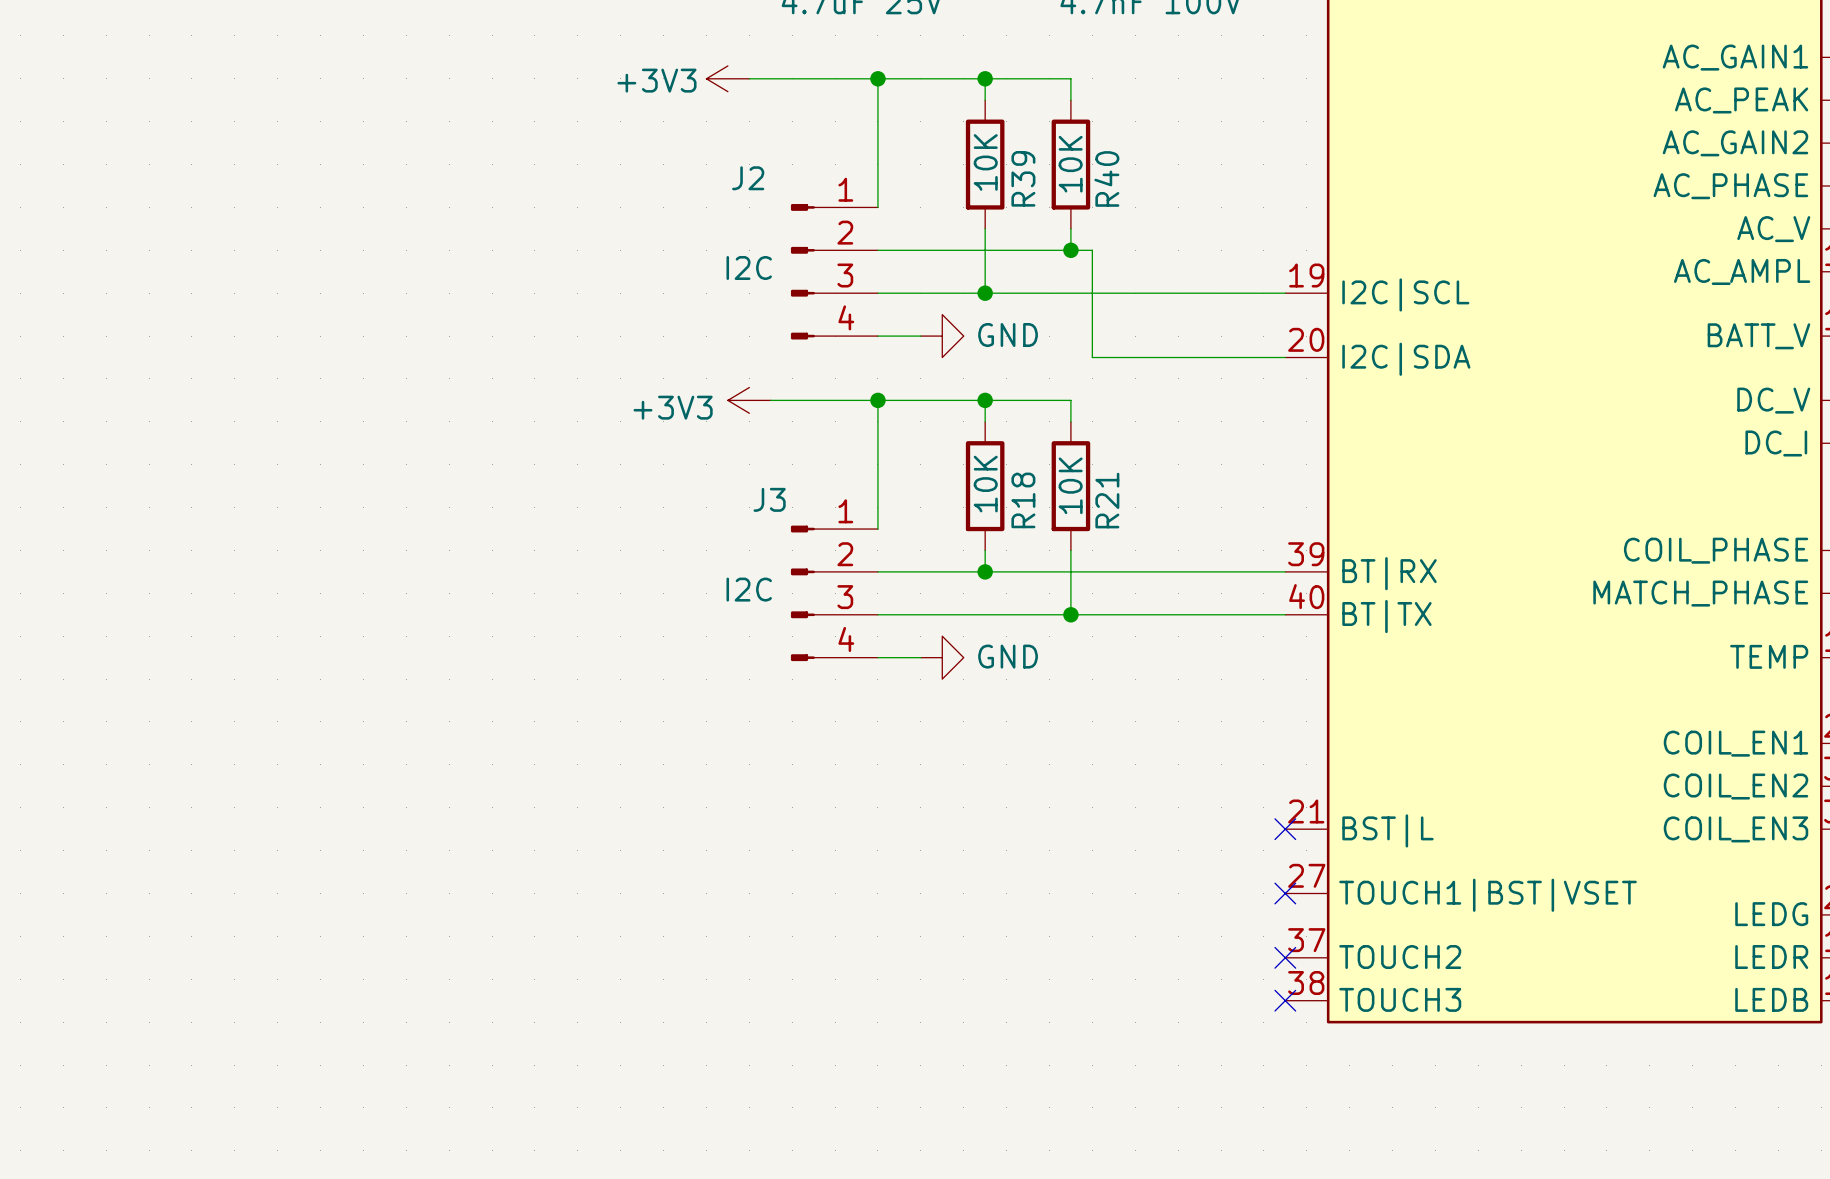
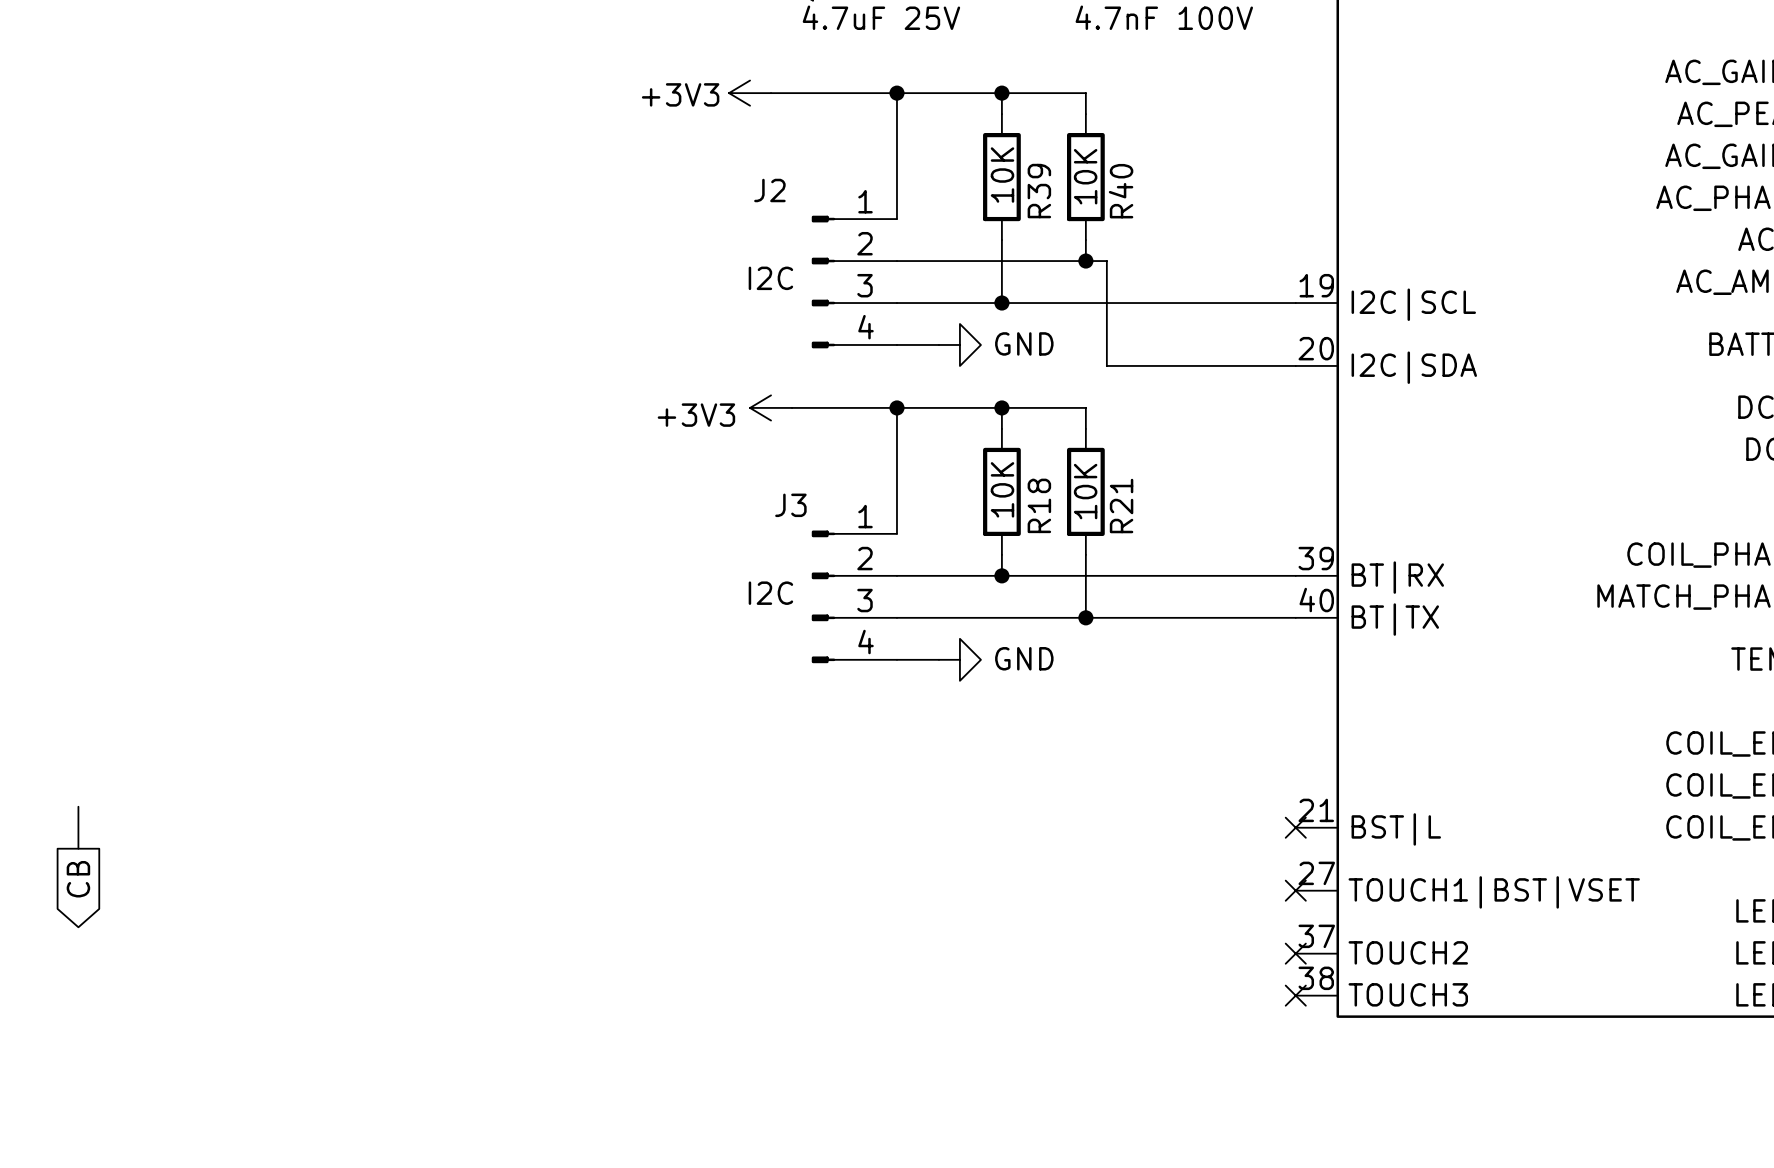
wire: none -> (78, 806) (78, 848)
global label: none -> CB (78, 879)

